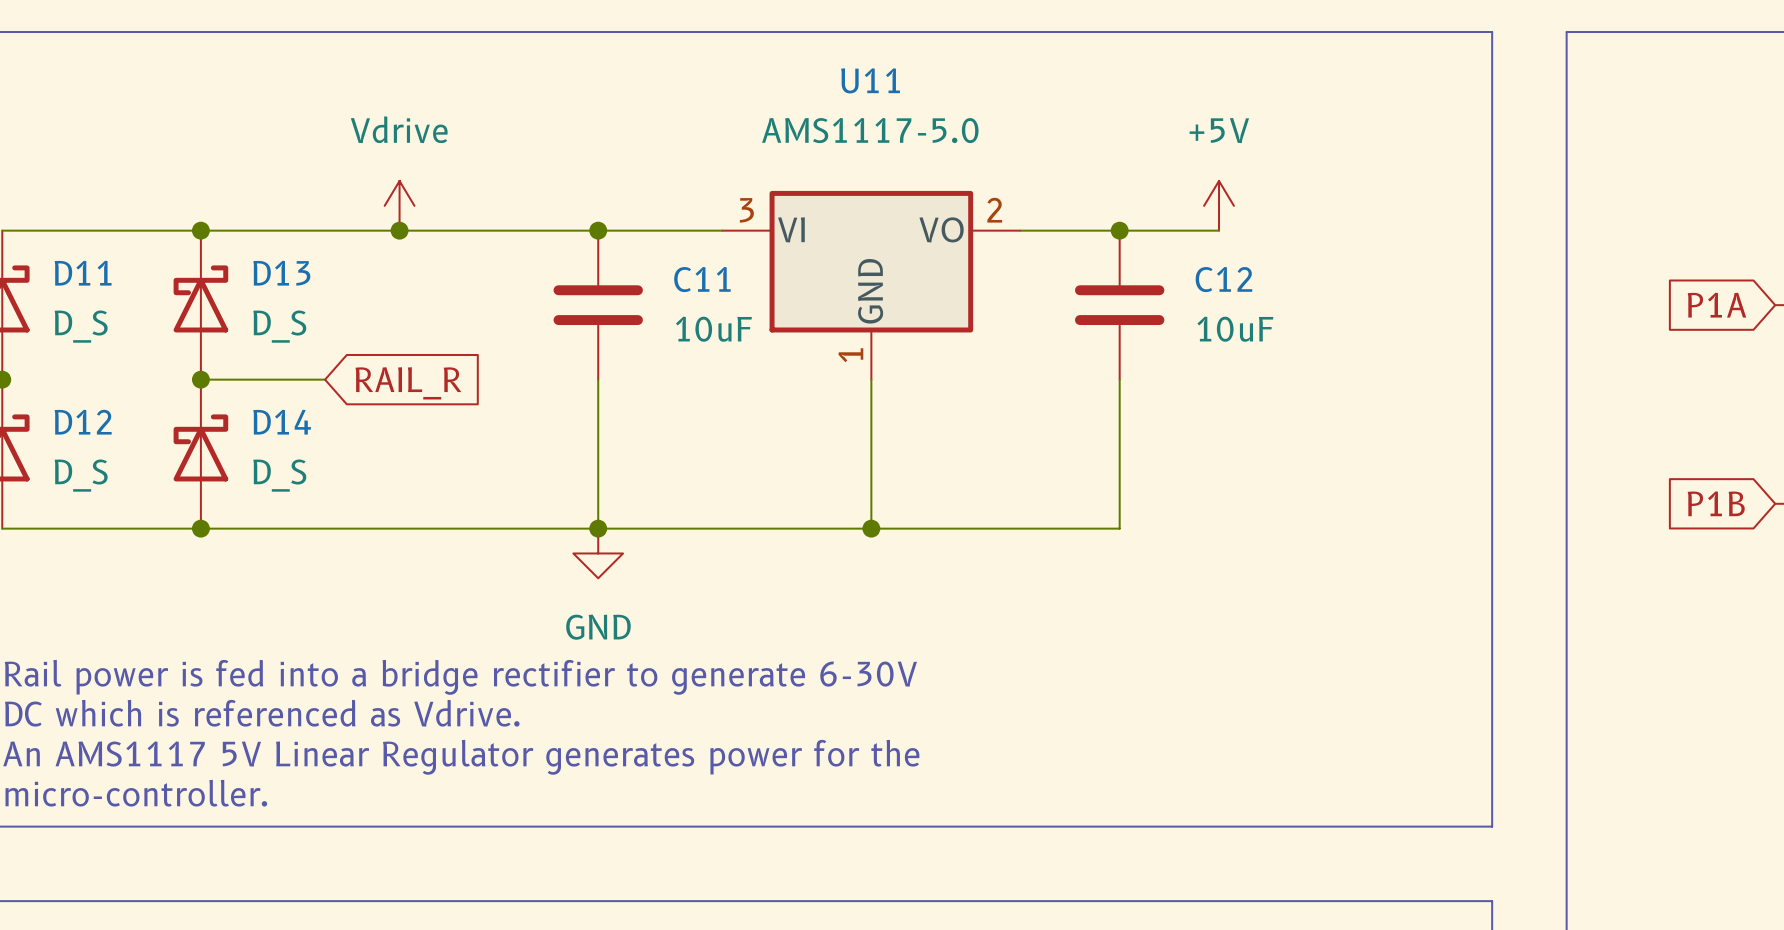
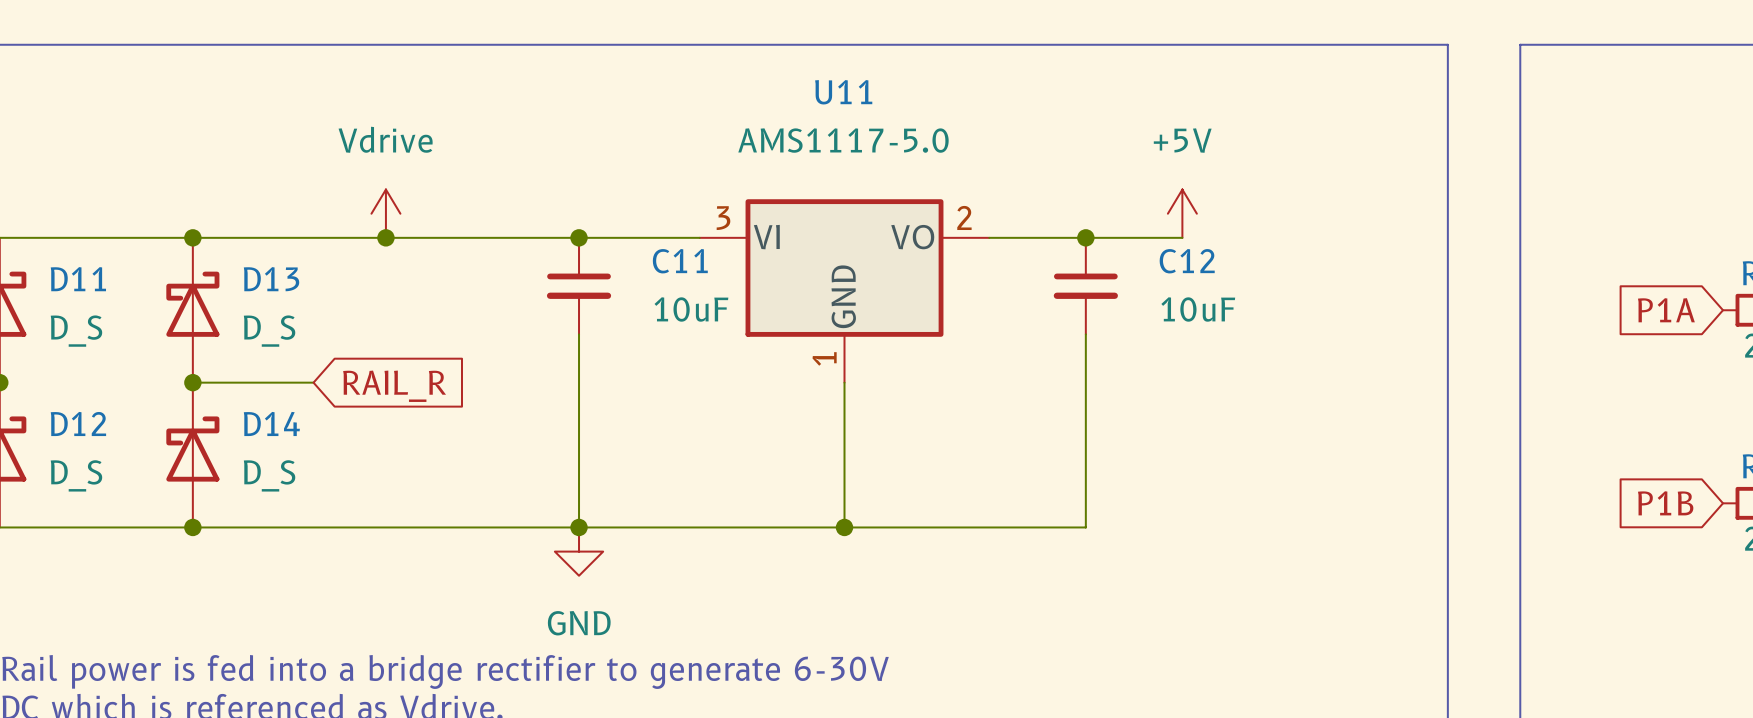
C11 symbol: [553, 230, 643, 380] -> [546, 237, 612, 335]
C12 symbol: [1074, 230, 1165, 380] -> [1053, 237, 1118, 335]

